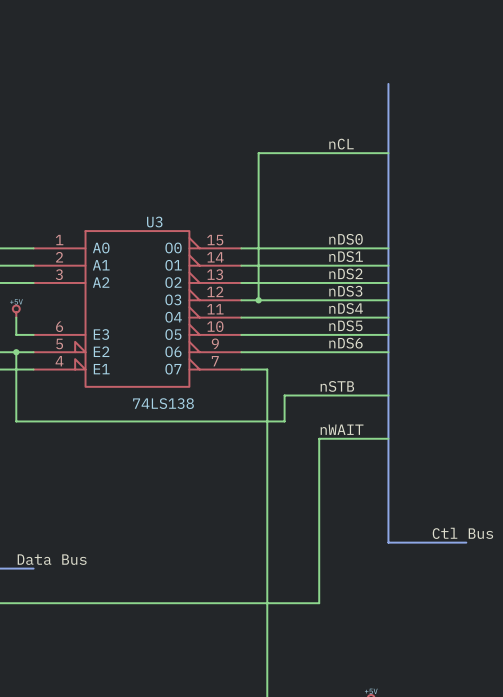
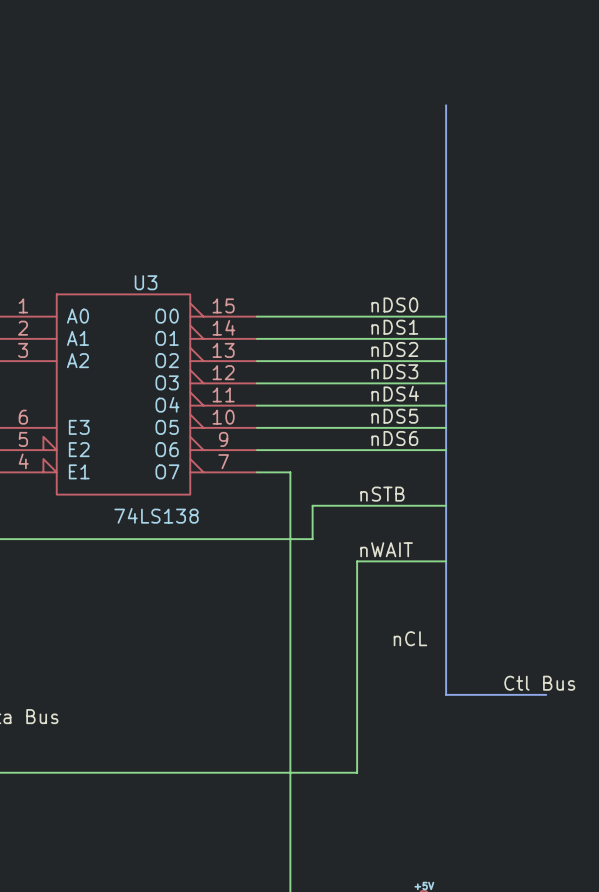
label: nCL (341, 144) -> none
wire: (388, 153) (258, 153) (258, 300) -> none
junction: (258, 300) -> none
label: none -> nCL (410, 638)

